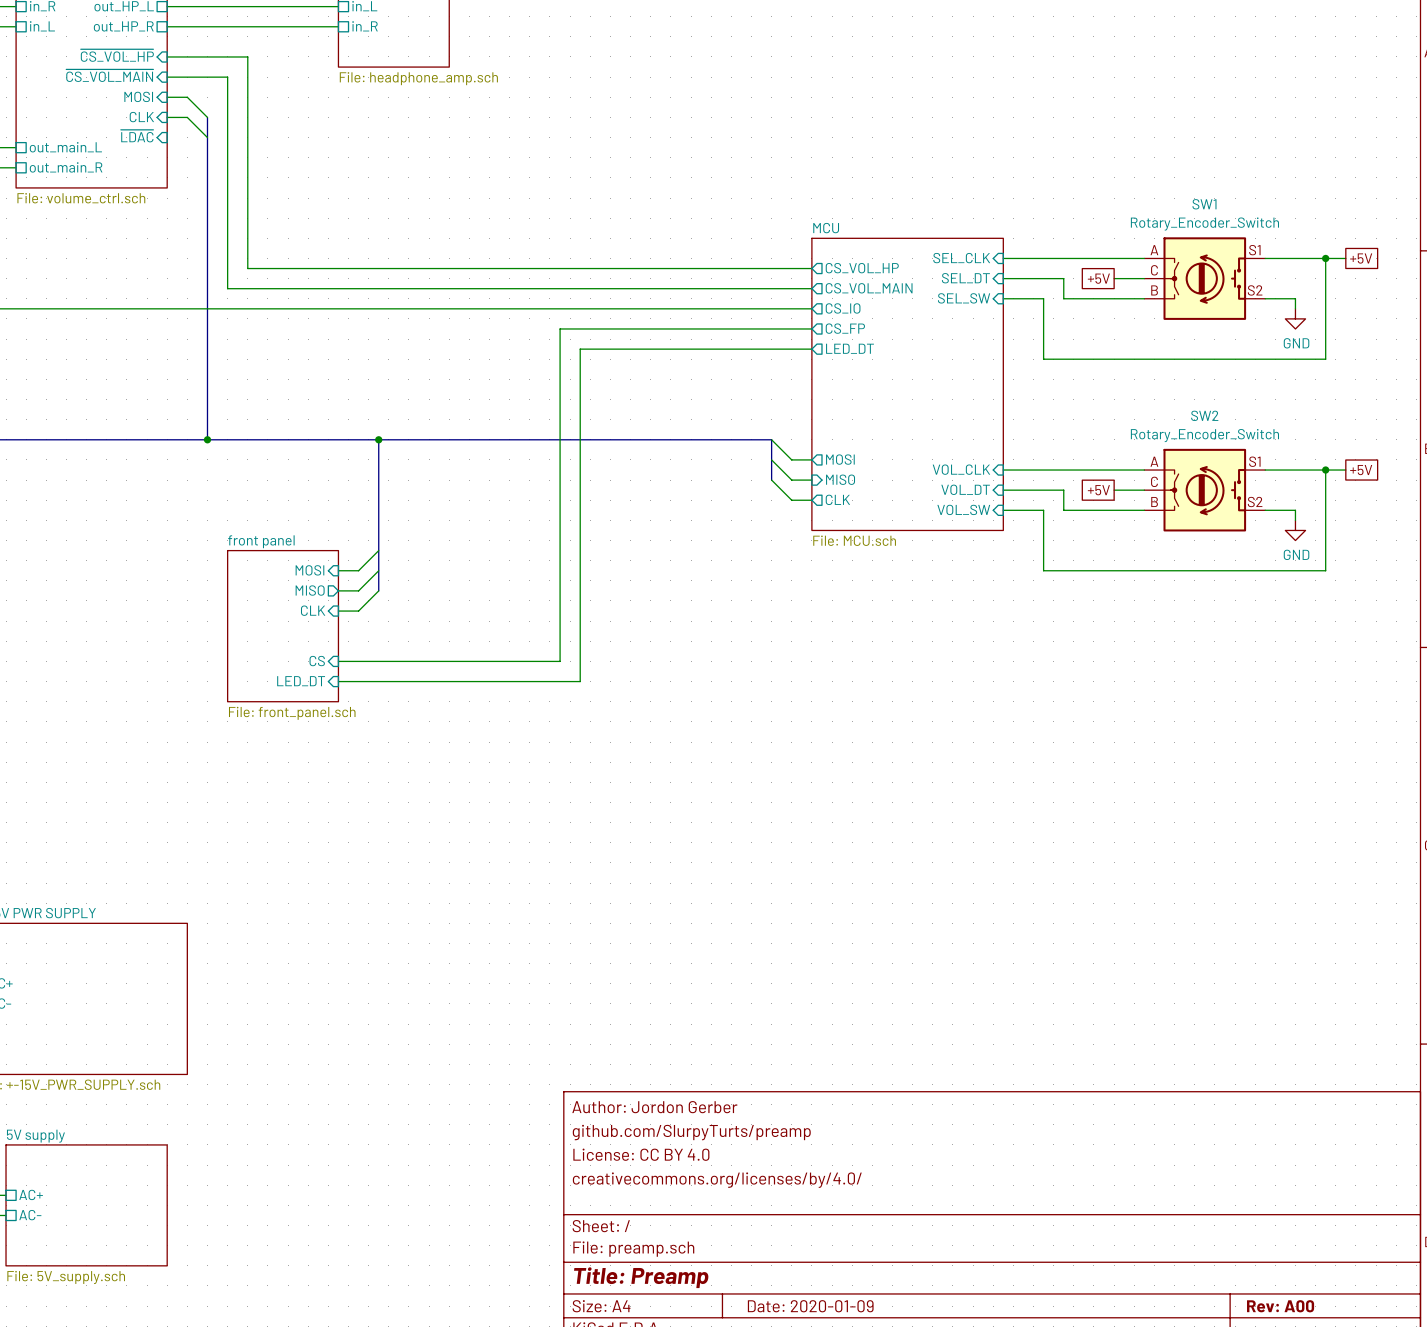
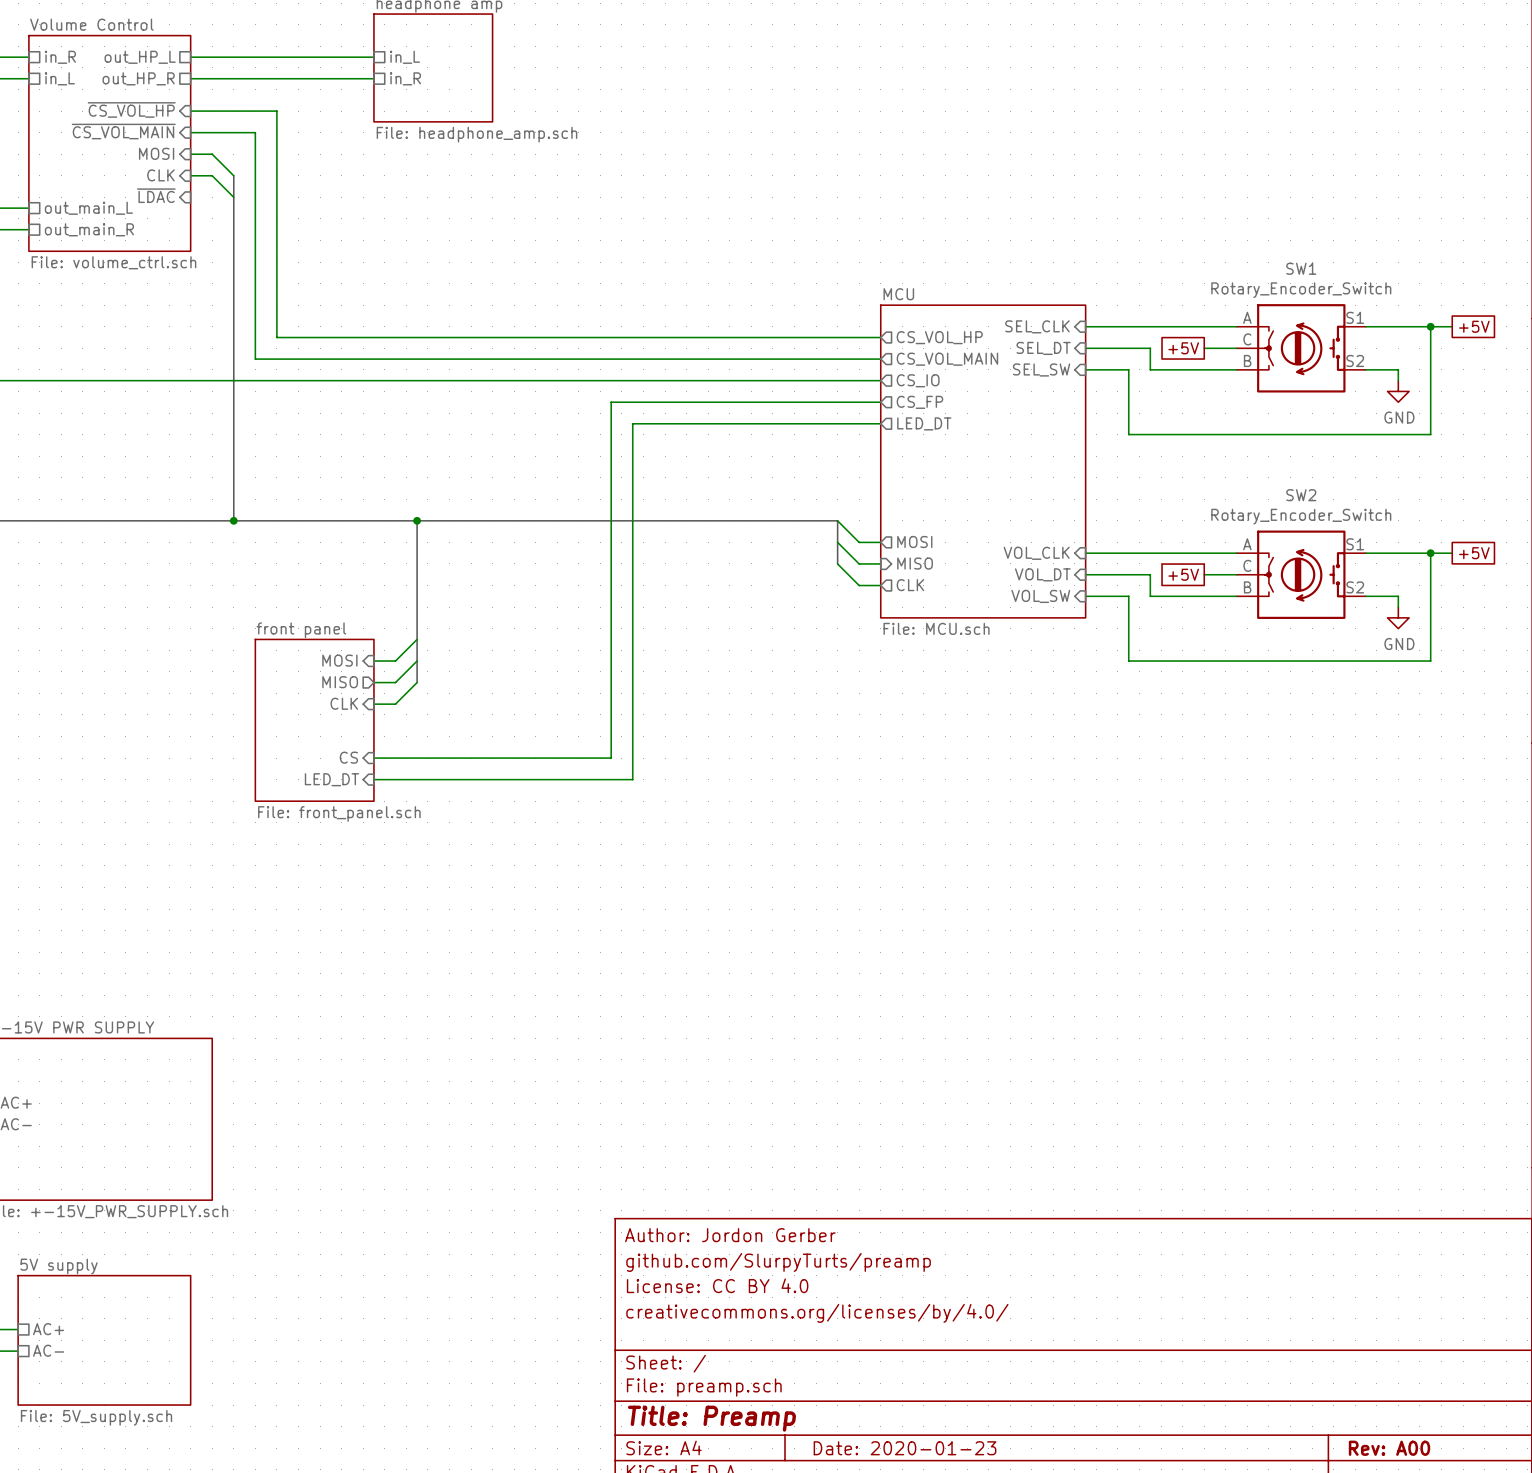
title block: Date: 2020-01-09 (810, 1306) -> Date: 2020-01-23 (905, 1448)

